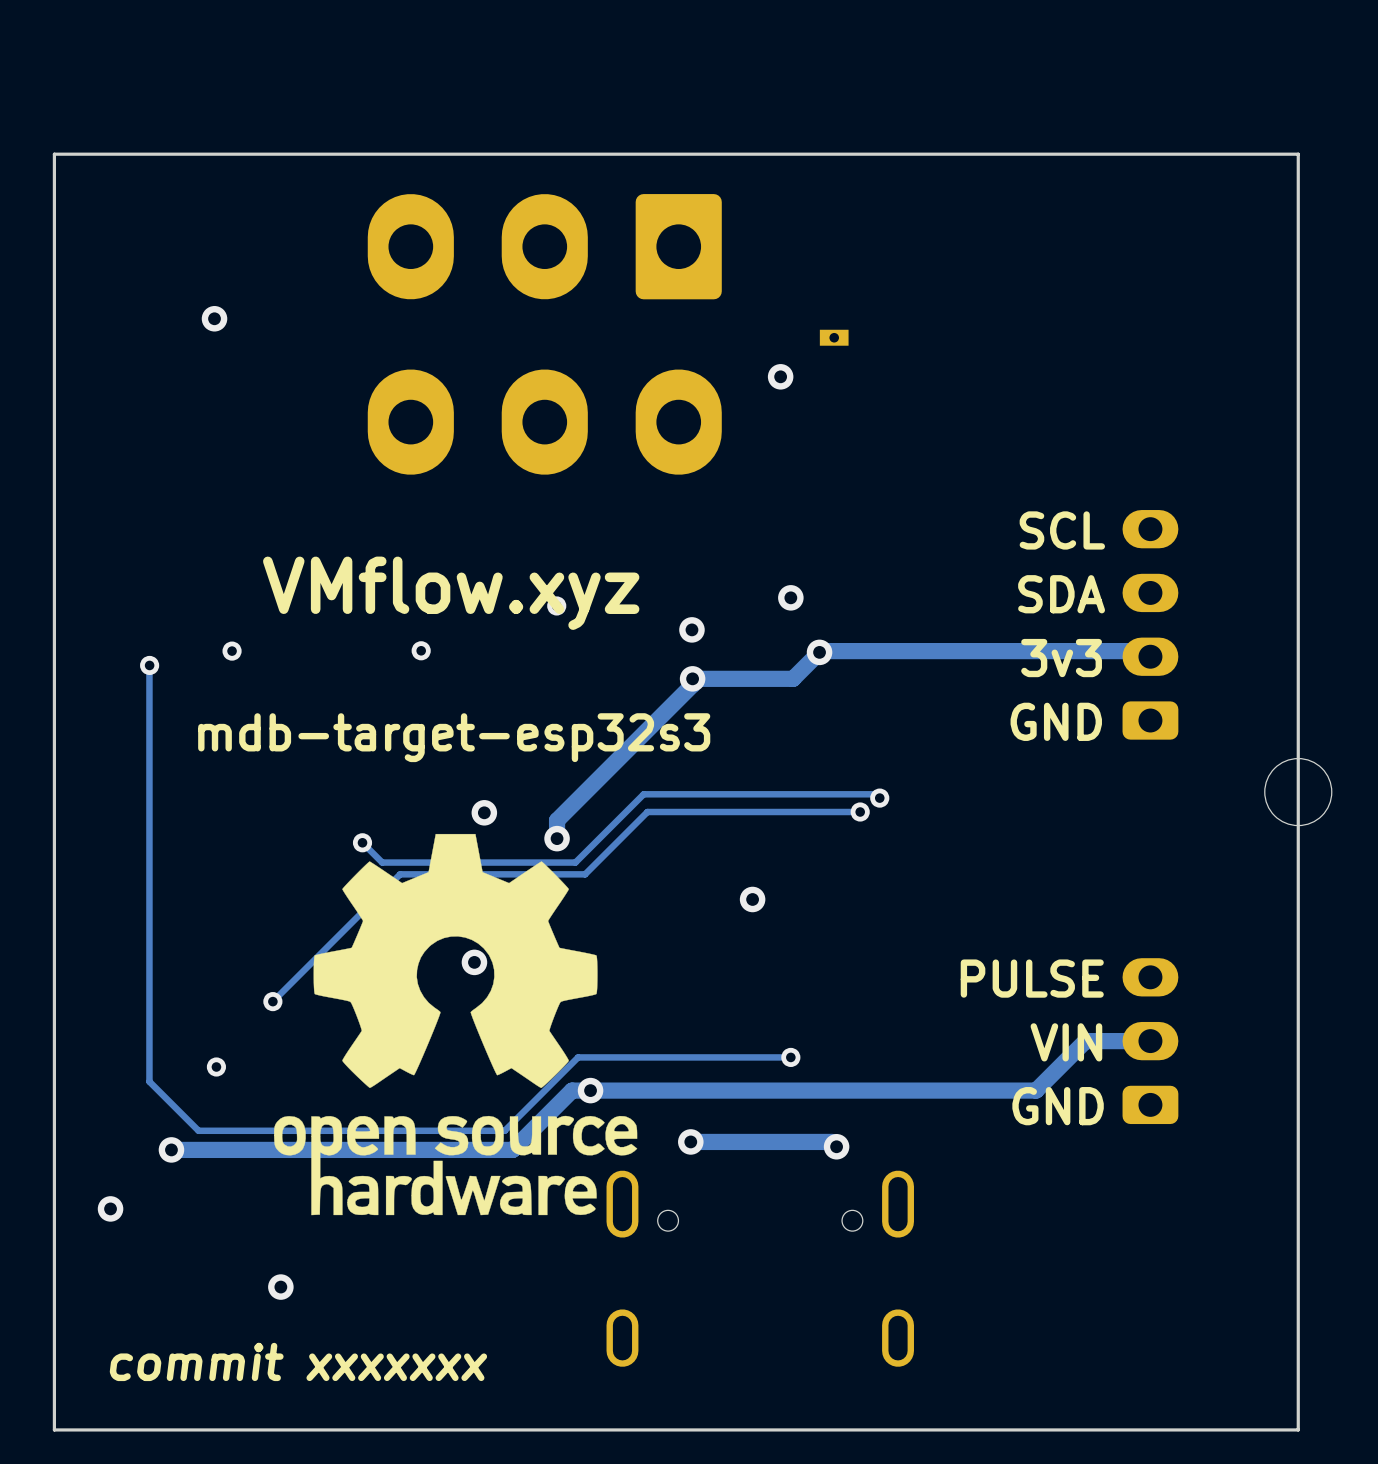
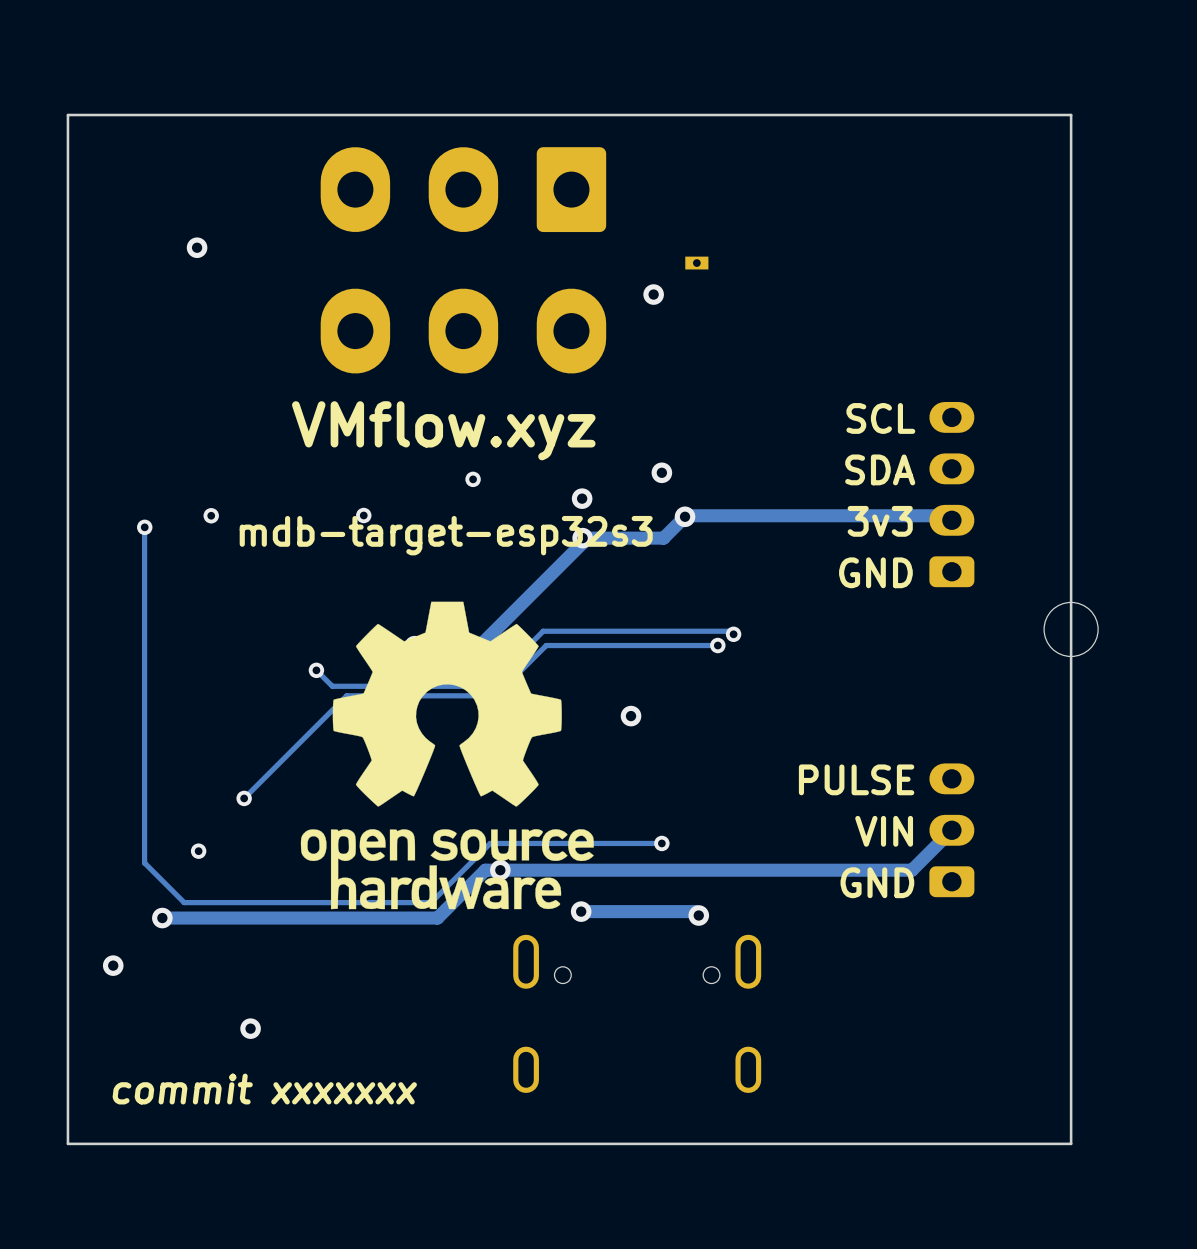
text position: VMflow.xyz (451, 593) -> VMflow.xyz (443, 430)
text position: mdb-target-esp32s3 (454, 737) -> mdb-target-esp32s3 (446, 535)
drawing position: (455, 1024) -> (447, 755)
track: (1150, 1041) (1085, 1041) (1036, 1090) -> (951, 830) (911, 870) (859, 870)

